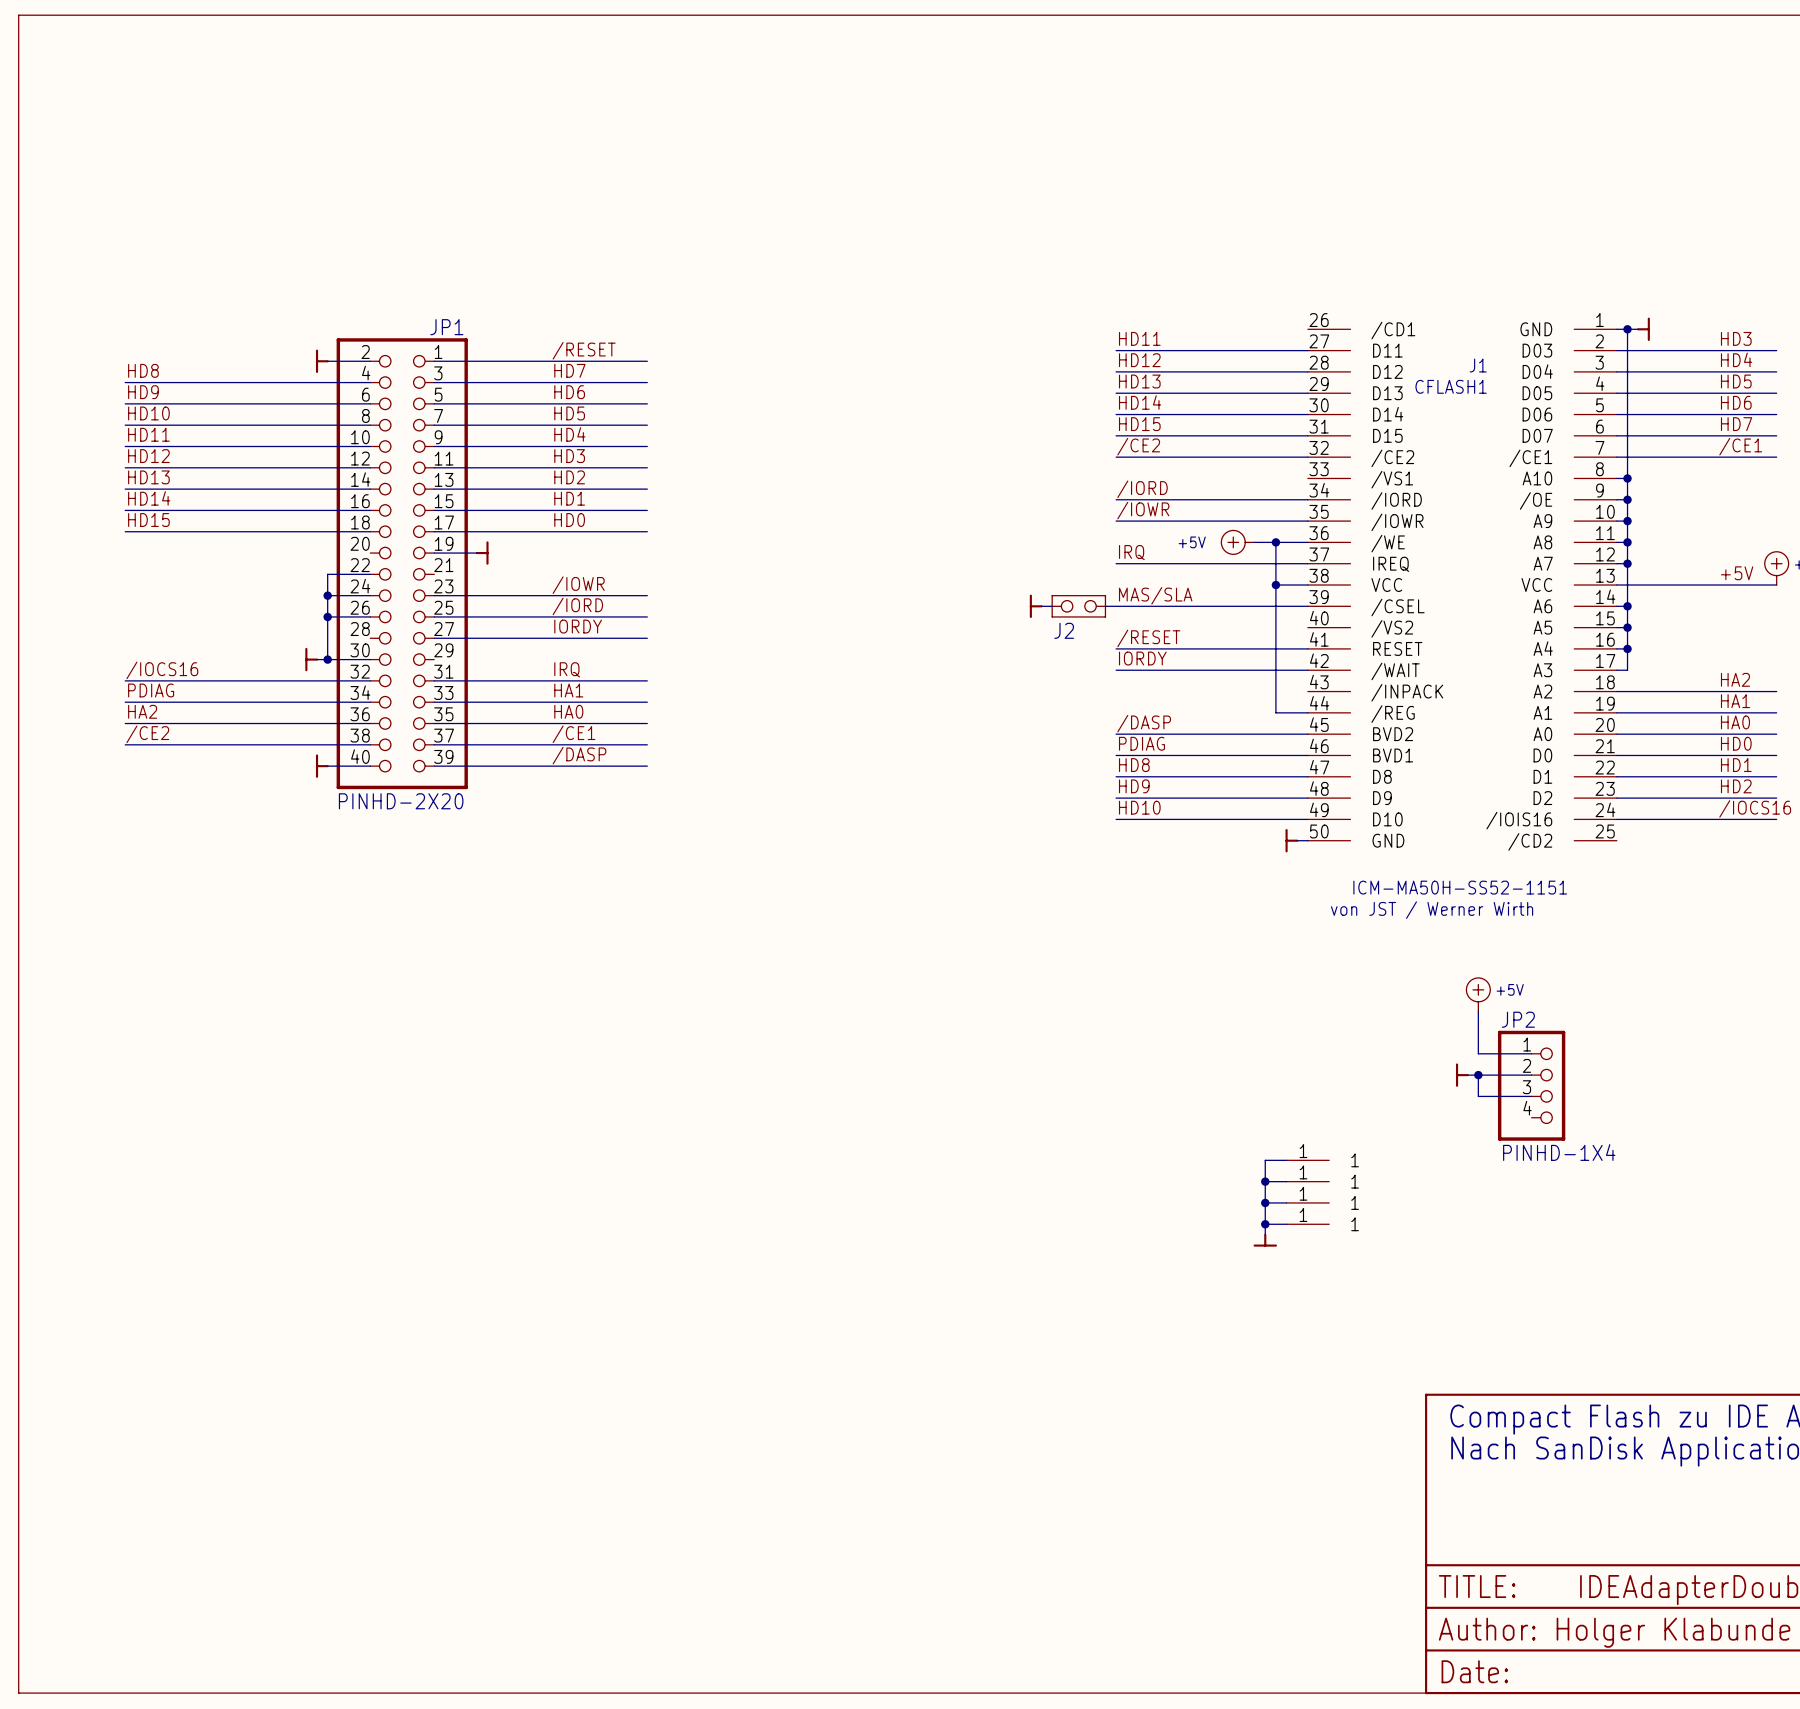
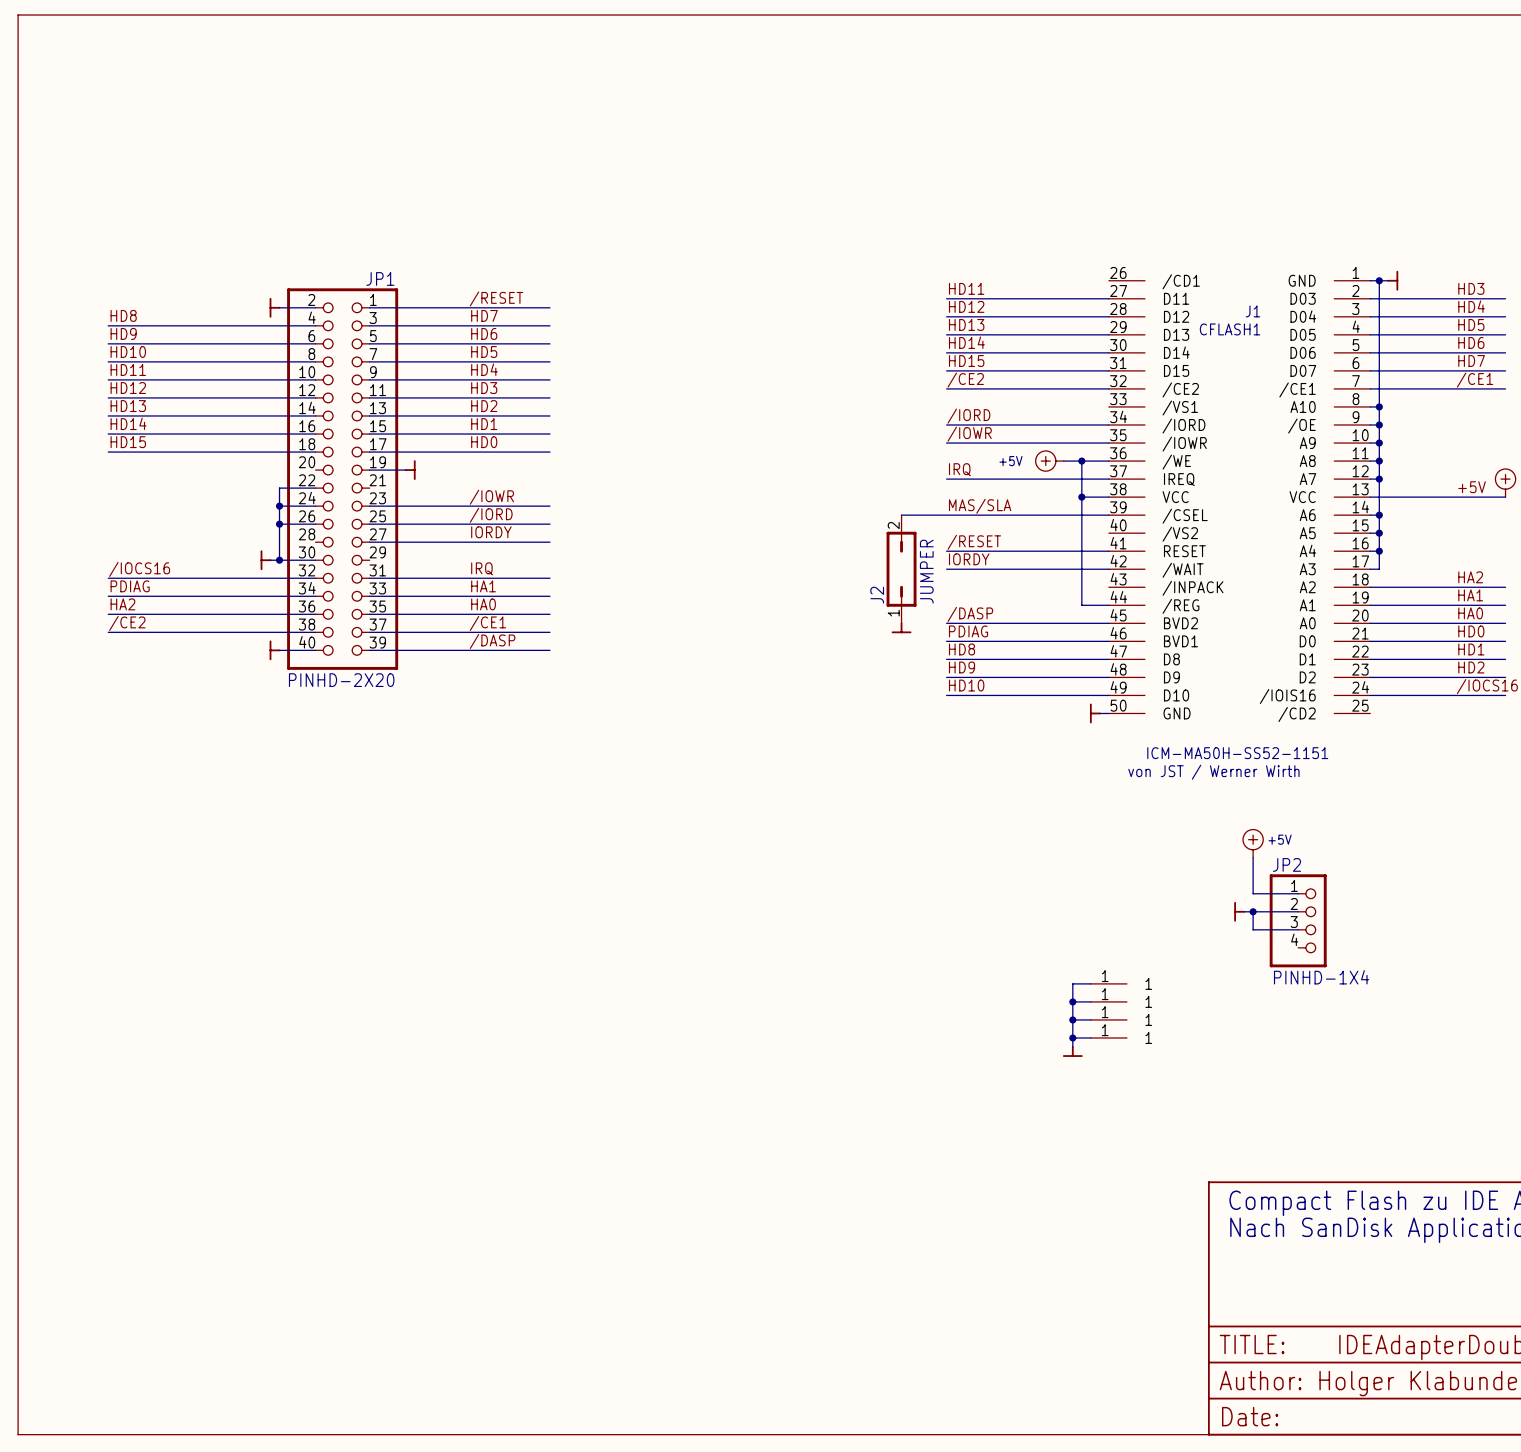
J2 symbol: [1052, 595, 1106, 617] -> [886, 515, 917, 624]
power symbol rotation: 0° (1036, 606) -> 90° counterclockwise (901, 627)
power symbol position: (1036, 606) -> (901, 627)
wire: (1041, 606) (1052, 606) -> none
wire: none -> (901, 515) (937, 515)
J2 name position: J2 (1064, 630) -> J2 (877, 595)
J2 value: none -> JUMPER (926, 571)

